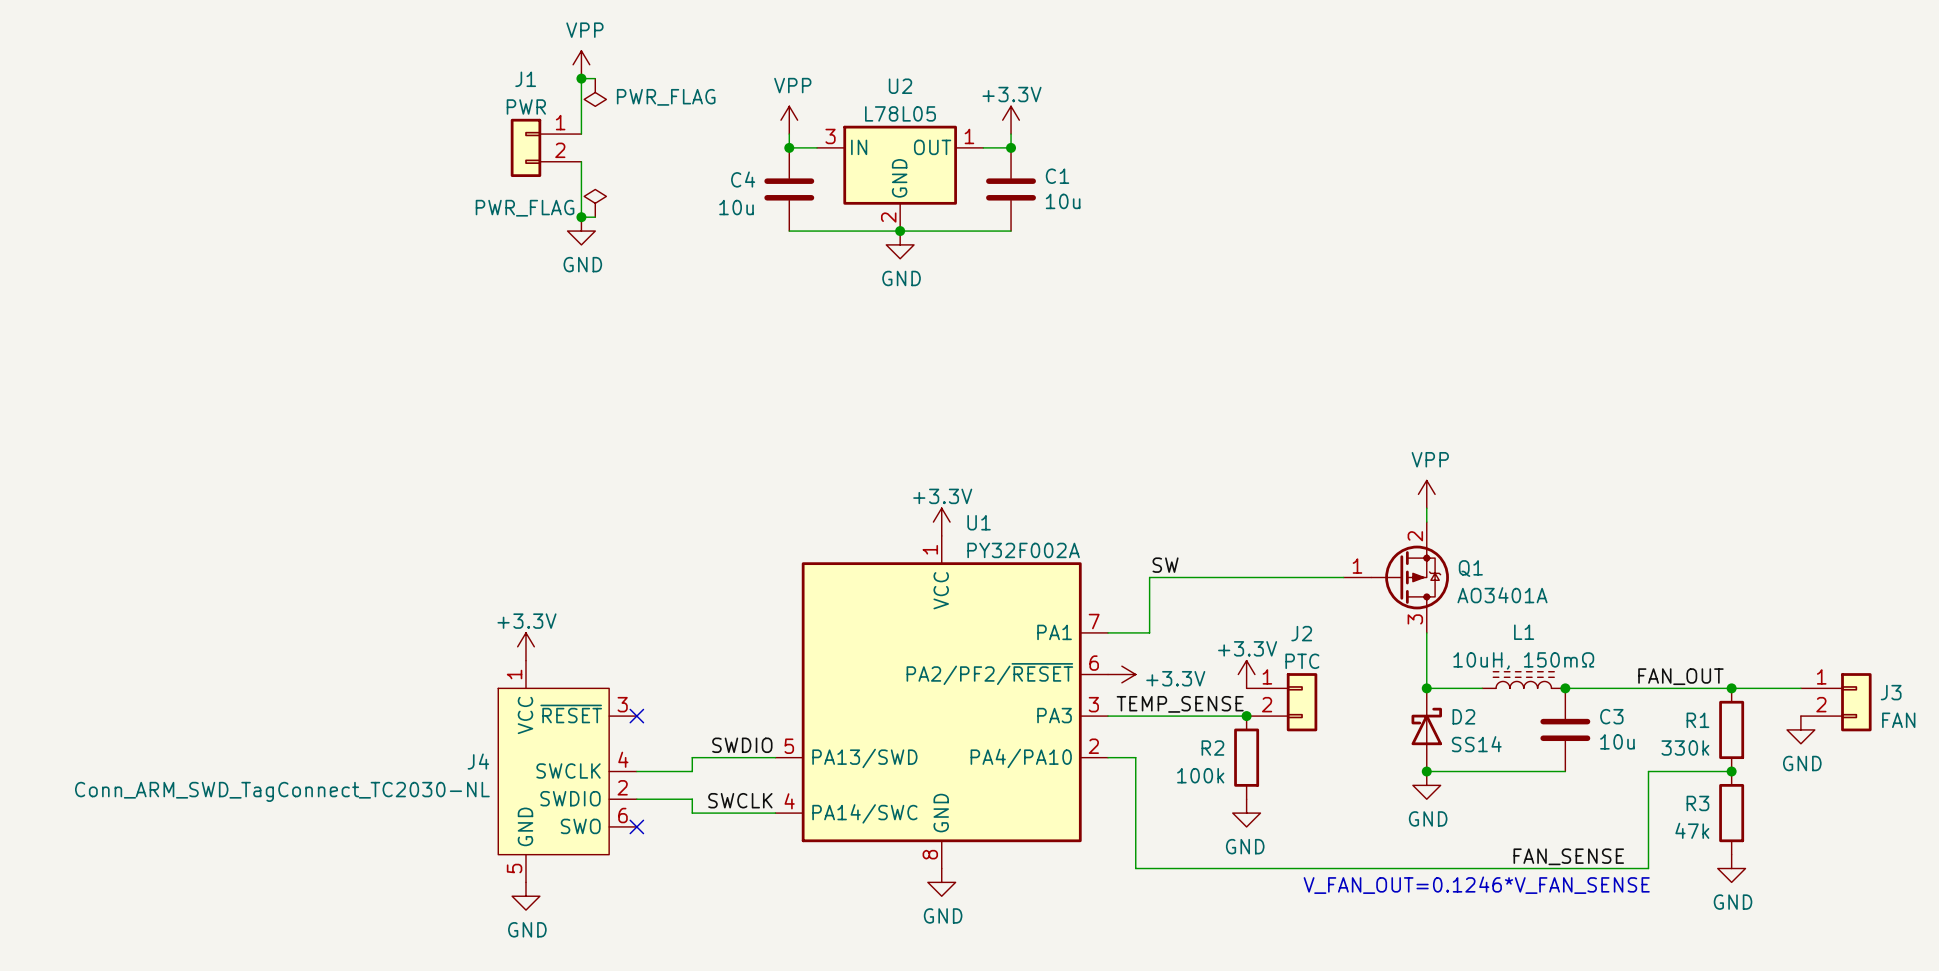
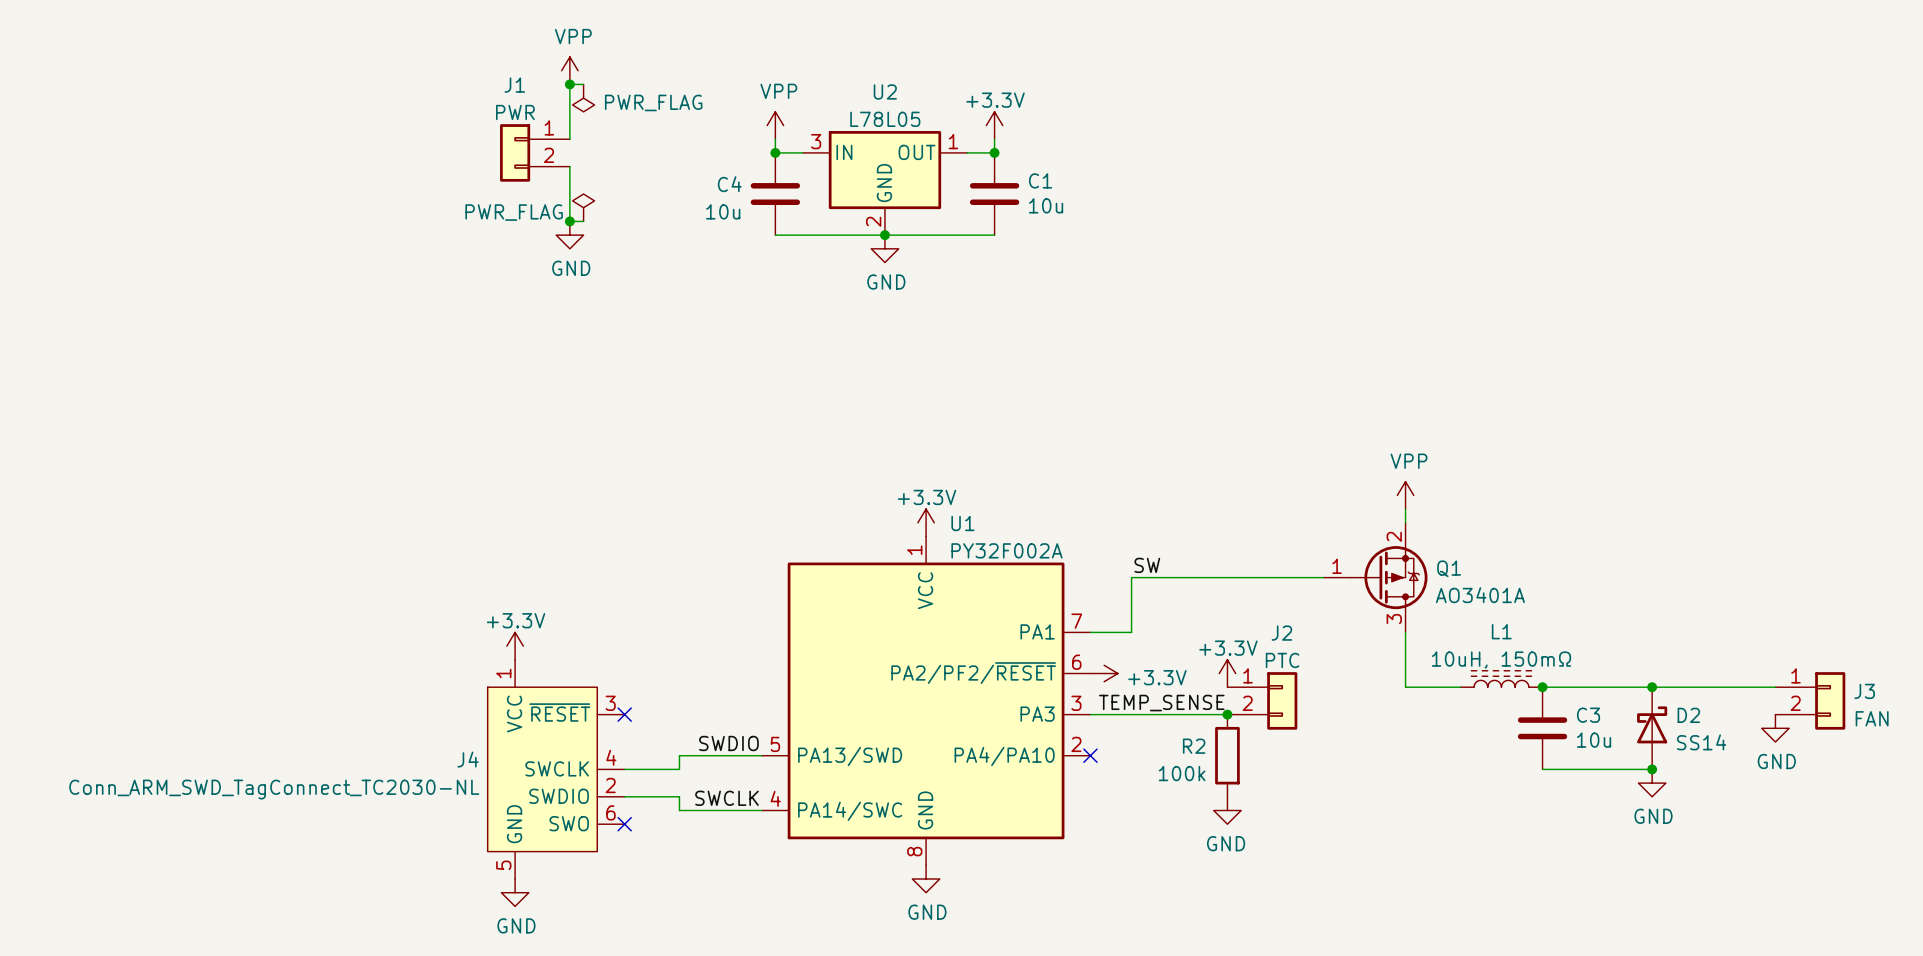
label: FAN_OUT (1680, 676) -> none
junction: (1426, 688) -> none
junction: none -> (1652, 687)
junction: (1731, 688) -> none
D2 position: (1426, 729) -> (1652, 728)
R1: 330k (1731, 729) -> none
wire: (1108, 757) (1135, 757) (1135, 868) (1648, 868) (1648, 771) -> none
no-connect mark: none -> (1090, 755)
wire: (1426, 771) (1565, 771) -> (1624, 769) (1542, 769)
junction: (1426, 771) -> none
wire: (1676, 771) (1731, 771) -> none
junction: none -> (1652, 769)
junction: (1731, 771) -> none
power symbol: GND (1426, 785) -> none
R3: 47k (1731, 813) -> none
label: FAN_SENSE (1568, 856) -> none
power symbol position: GND (1731, 868) -> GND (1652, 783)
text: V_FAN_OUT=0.1246*V_FAN_SENSE (1476, 885) -> none

